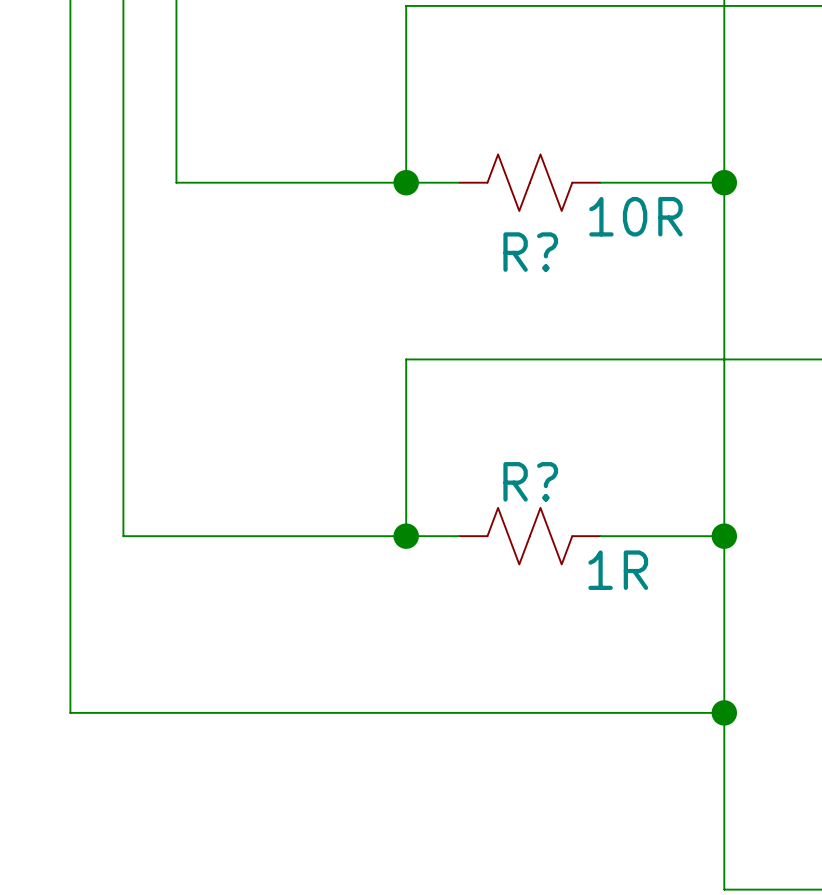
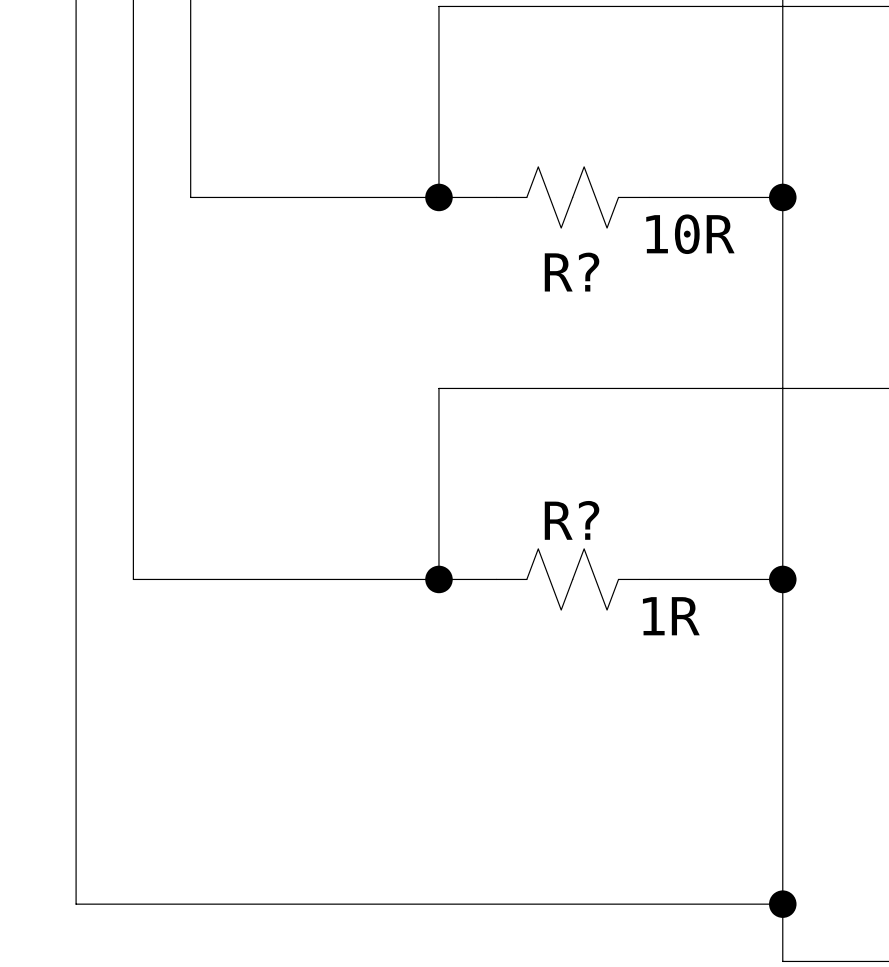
wire: (70, 712) (724, 712) -> (76, 770) (76, 904) (782, 904)
junction position: (724, 712) -> (782, 904)

